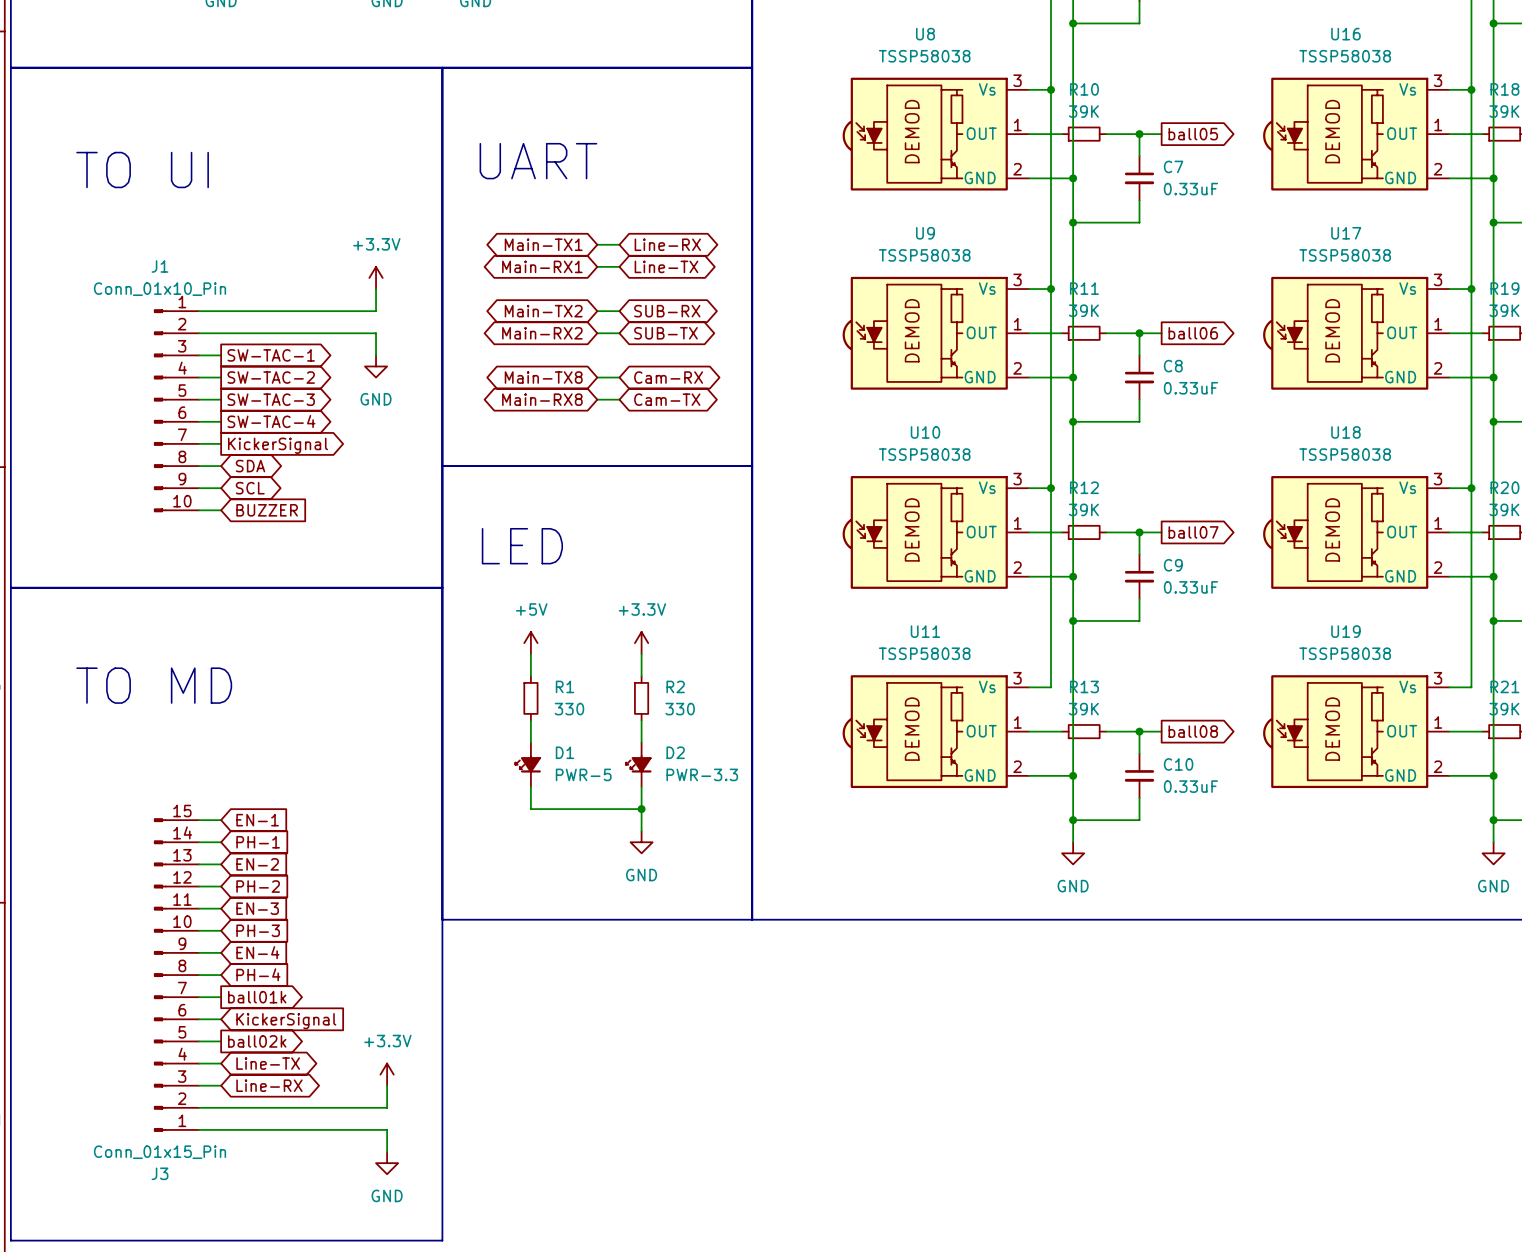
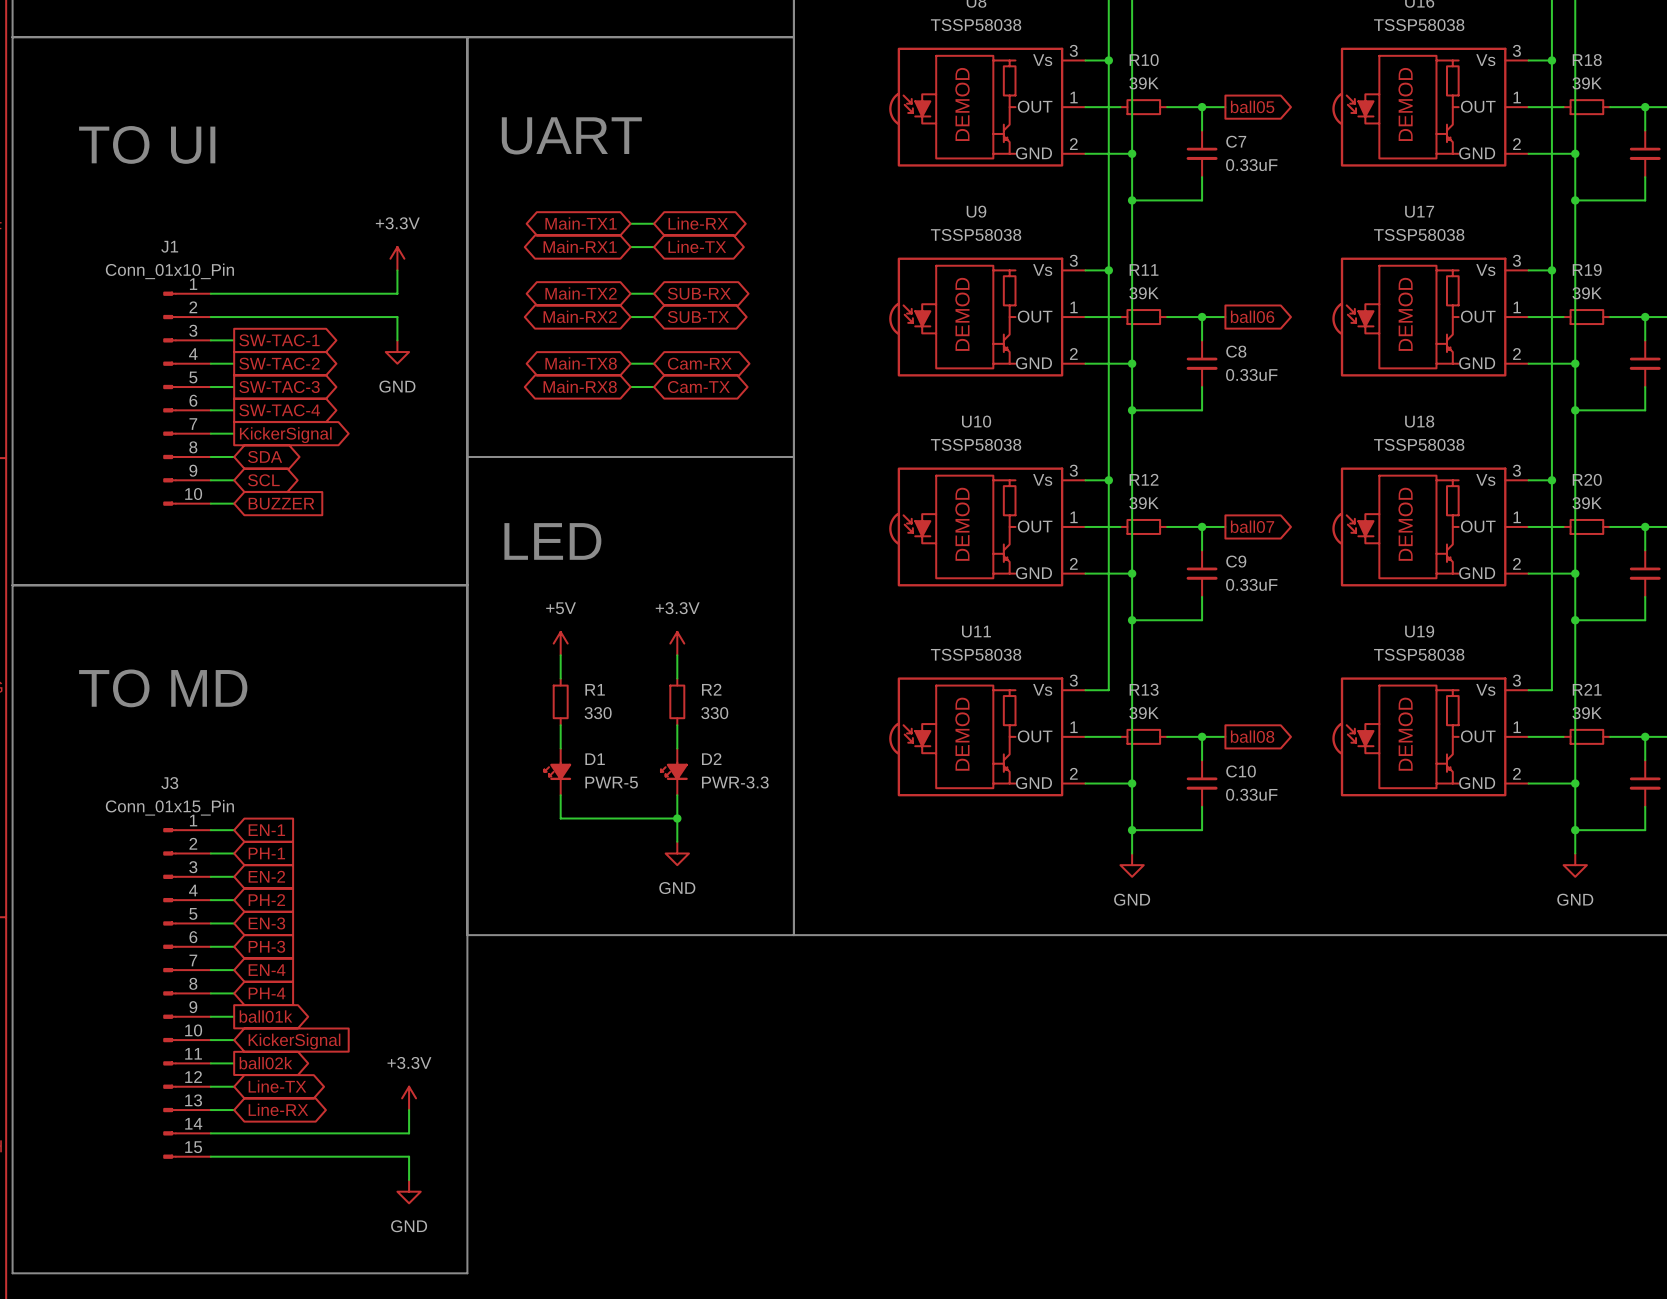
J3 flip: as is (160, 975) -> up-down (170, 993)

